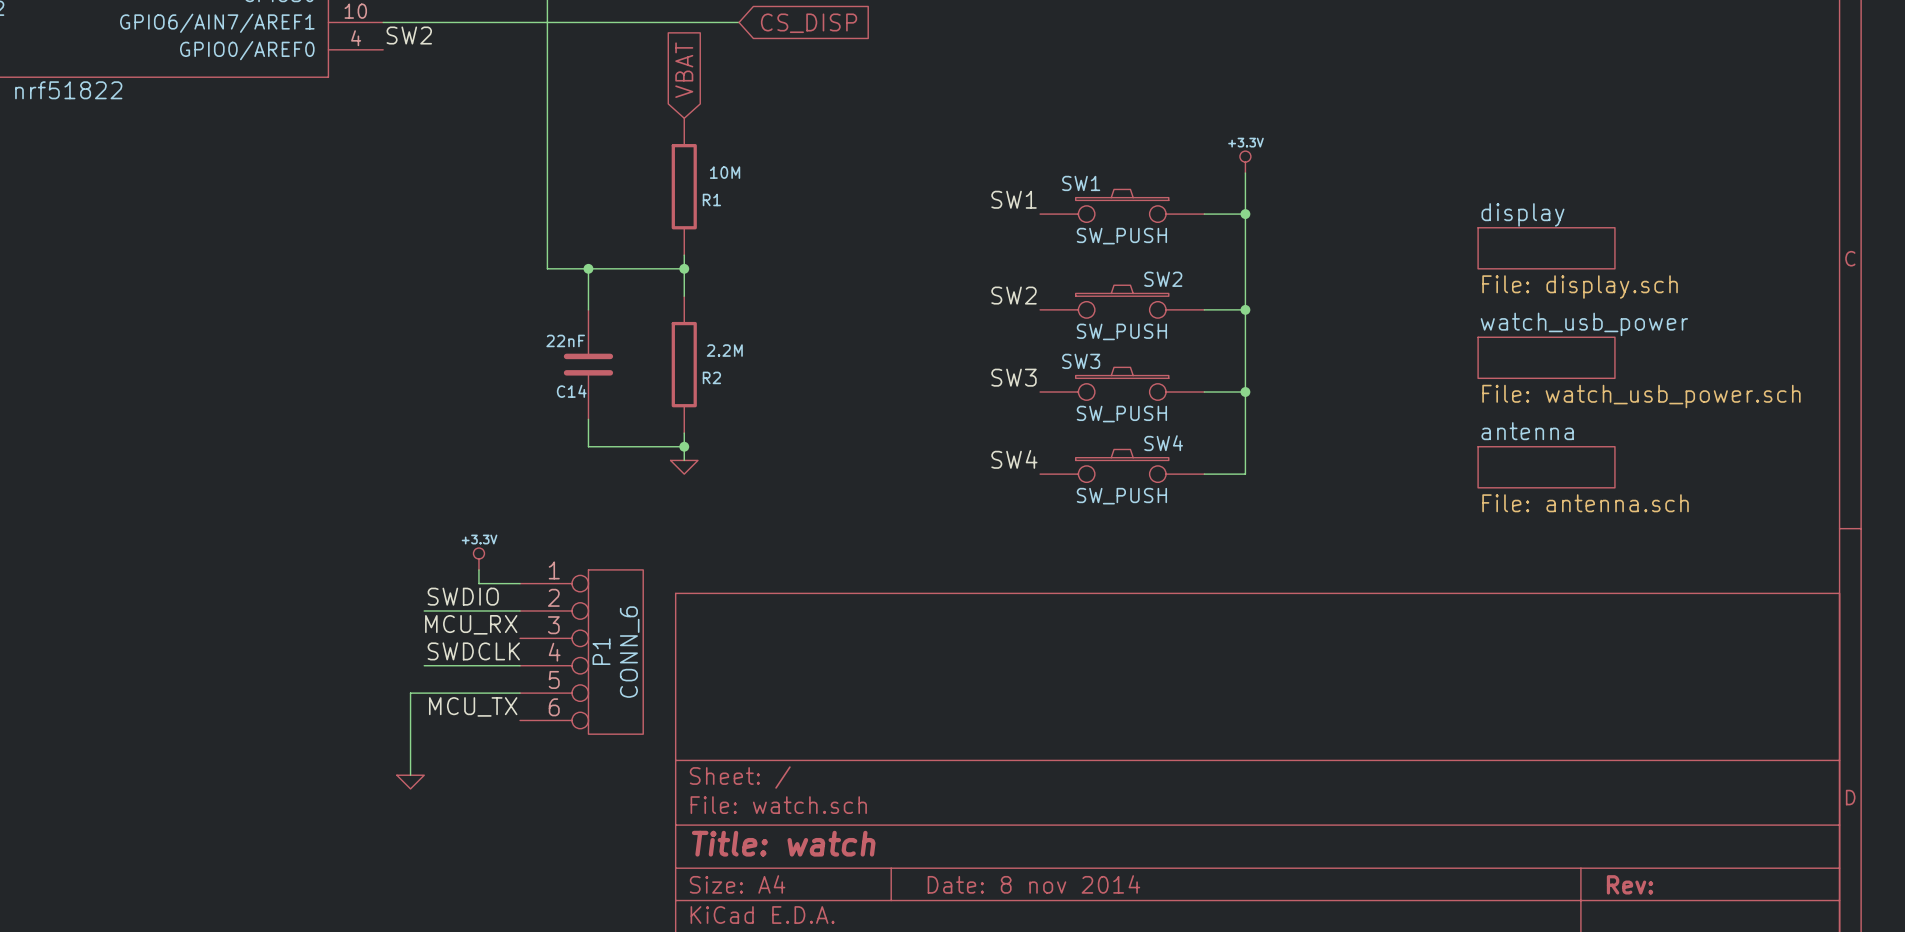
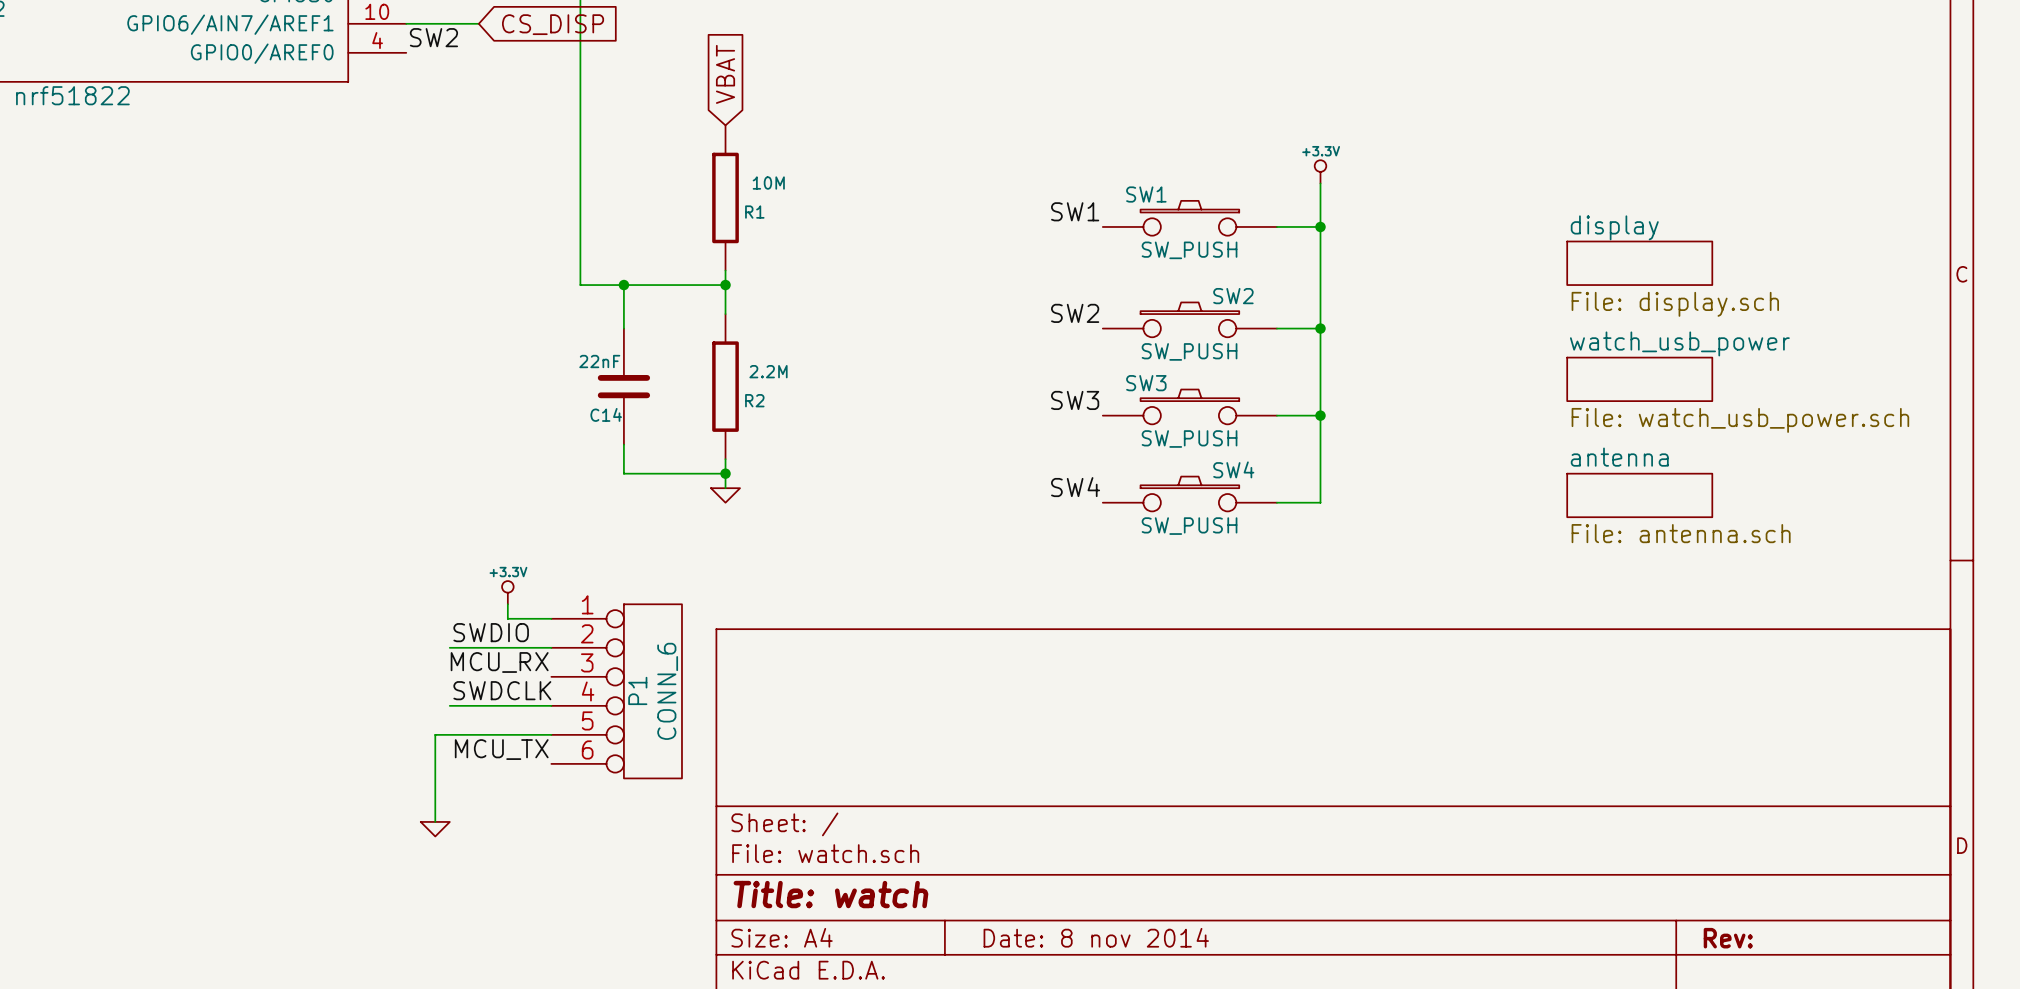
wire: (451, 22) (739, 22) -> none
global label: none -> CS_DISP (553, 24)
global label: CS_DISP (809, 23) -> none

